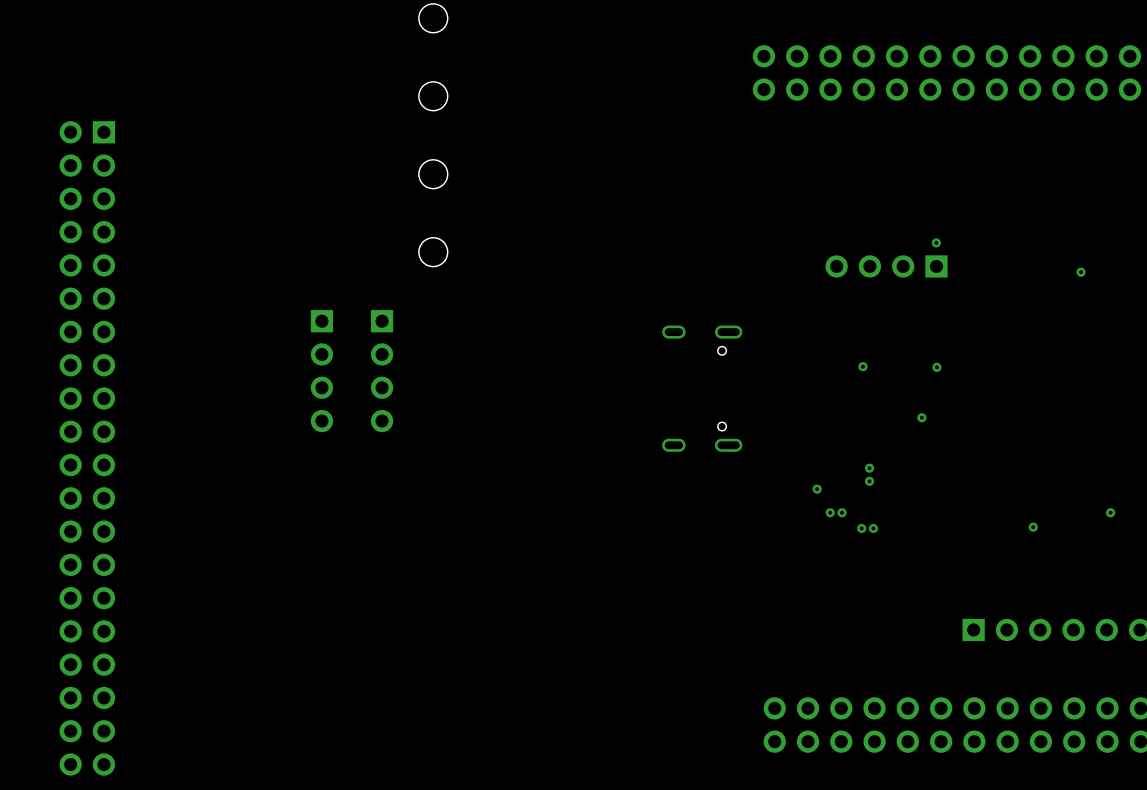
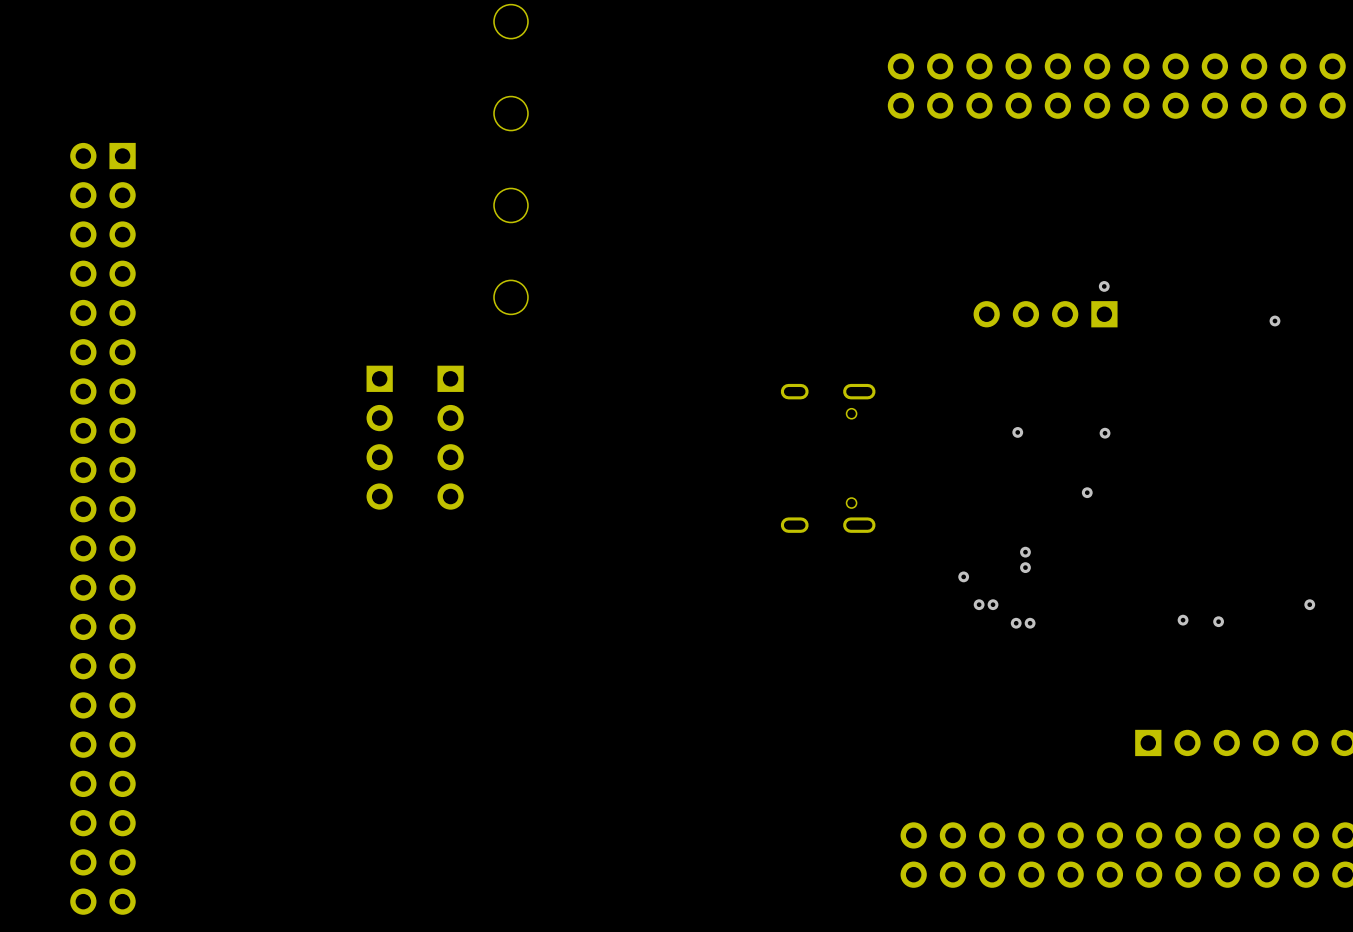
via: none -> (1183, 620)

